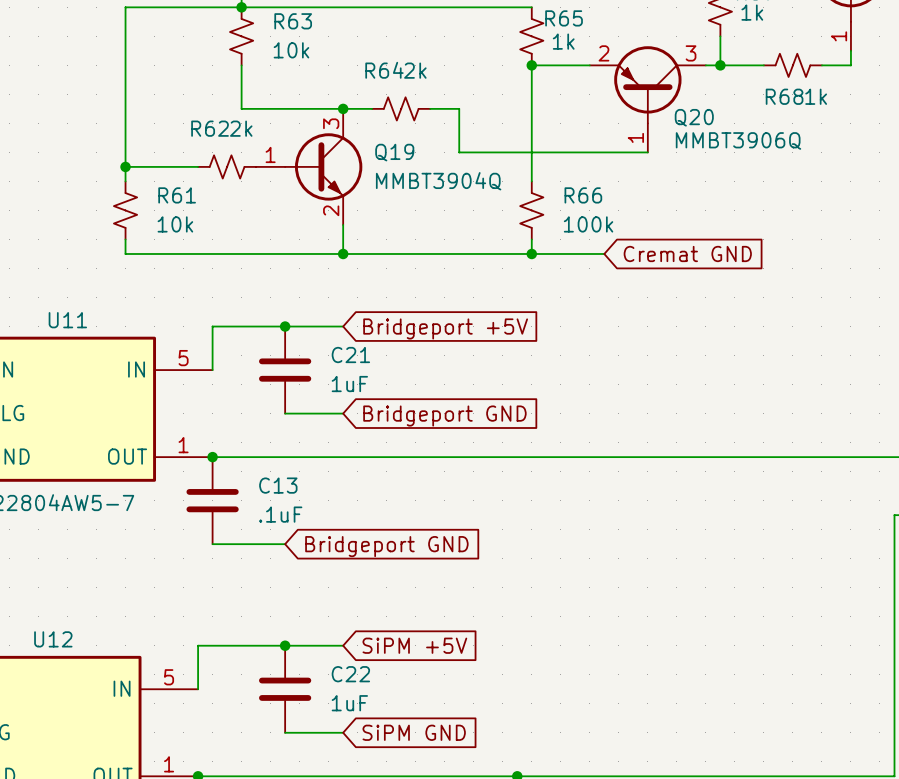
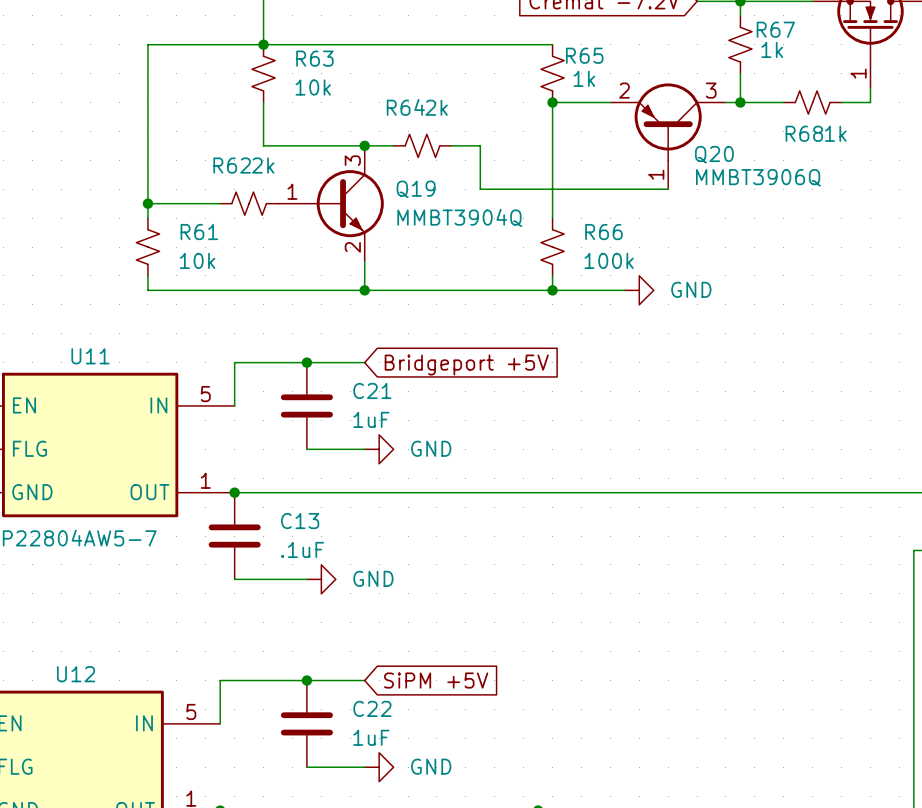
power symbol: none -> GND (639, 290)
global label: Cremat GND (687, 253) -> none
power symbol: none -> GND (379, 449)
global label: Bridgeport GND (444, 416) -> none
power symbol: none -> GND (321, 579)
global label: Bridgeport GND (386, 546) -> none
power symbol: none -> GND (379, 767)
global label: SiPM GND (414, 732) -> none

